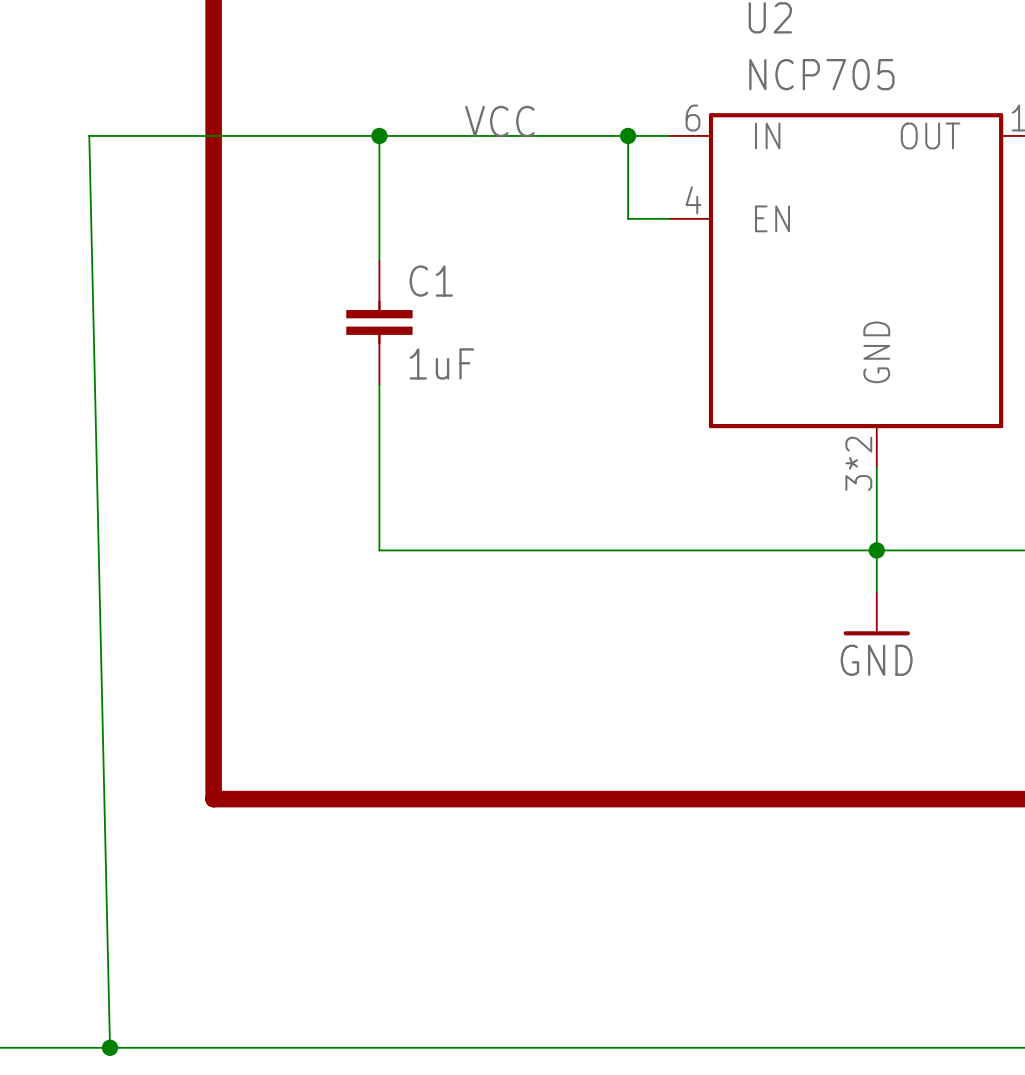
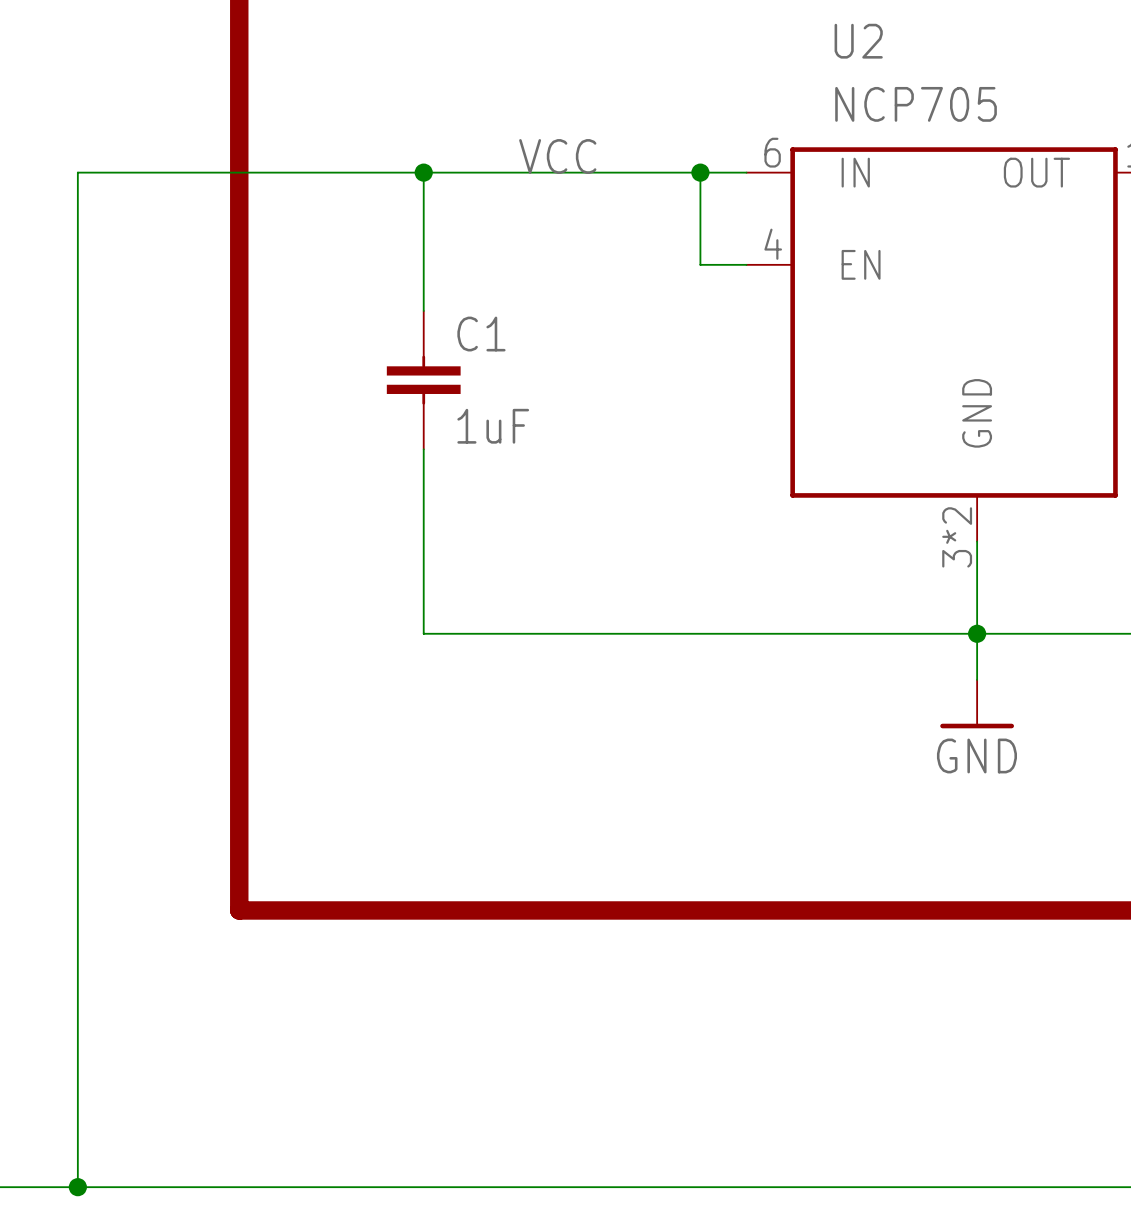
wire: (89, 135) (110, 1047) -> (100, 172) (77, 172) (77, 1187)
junction position: (110, 1047) -> (77, 1187)

